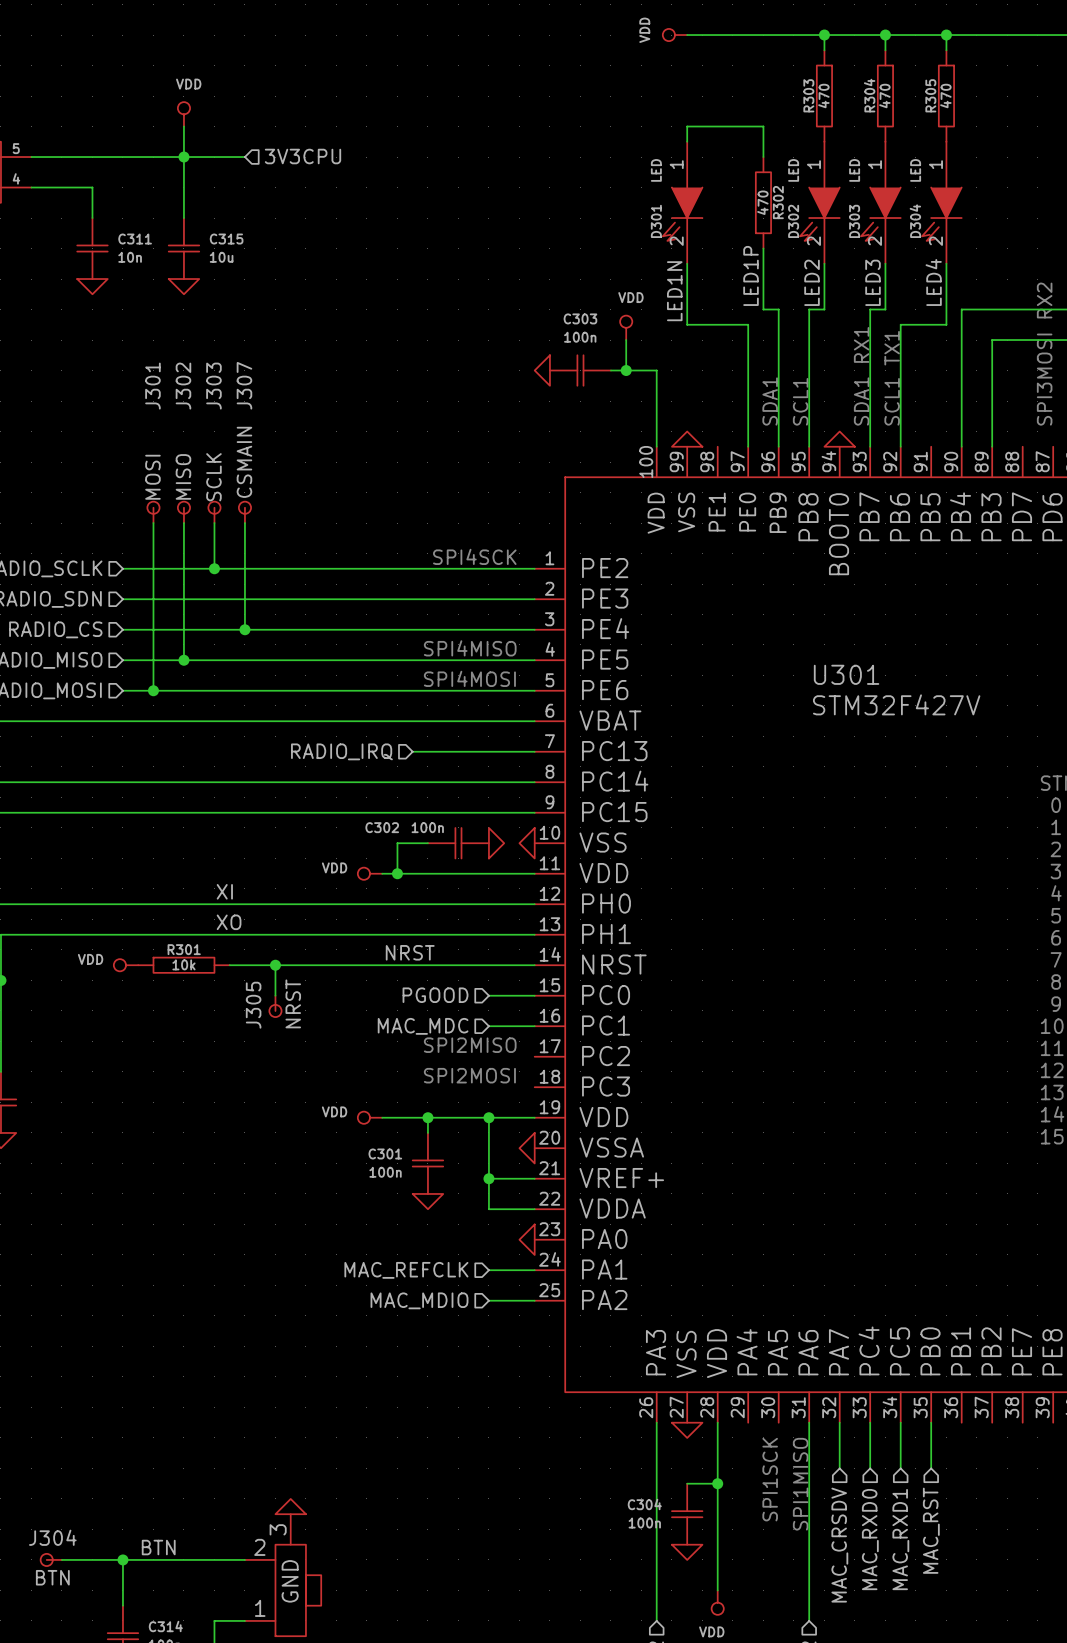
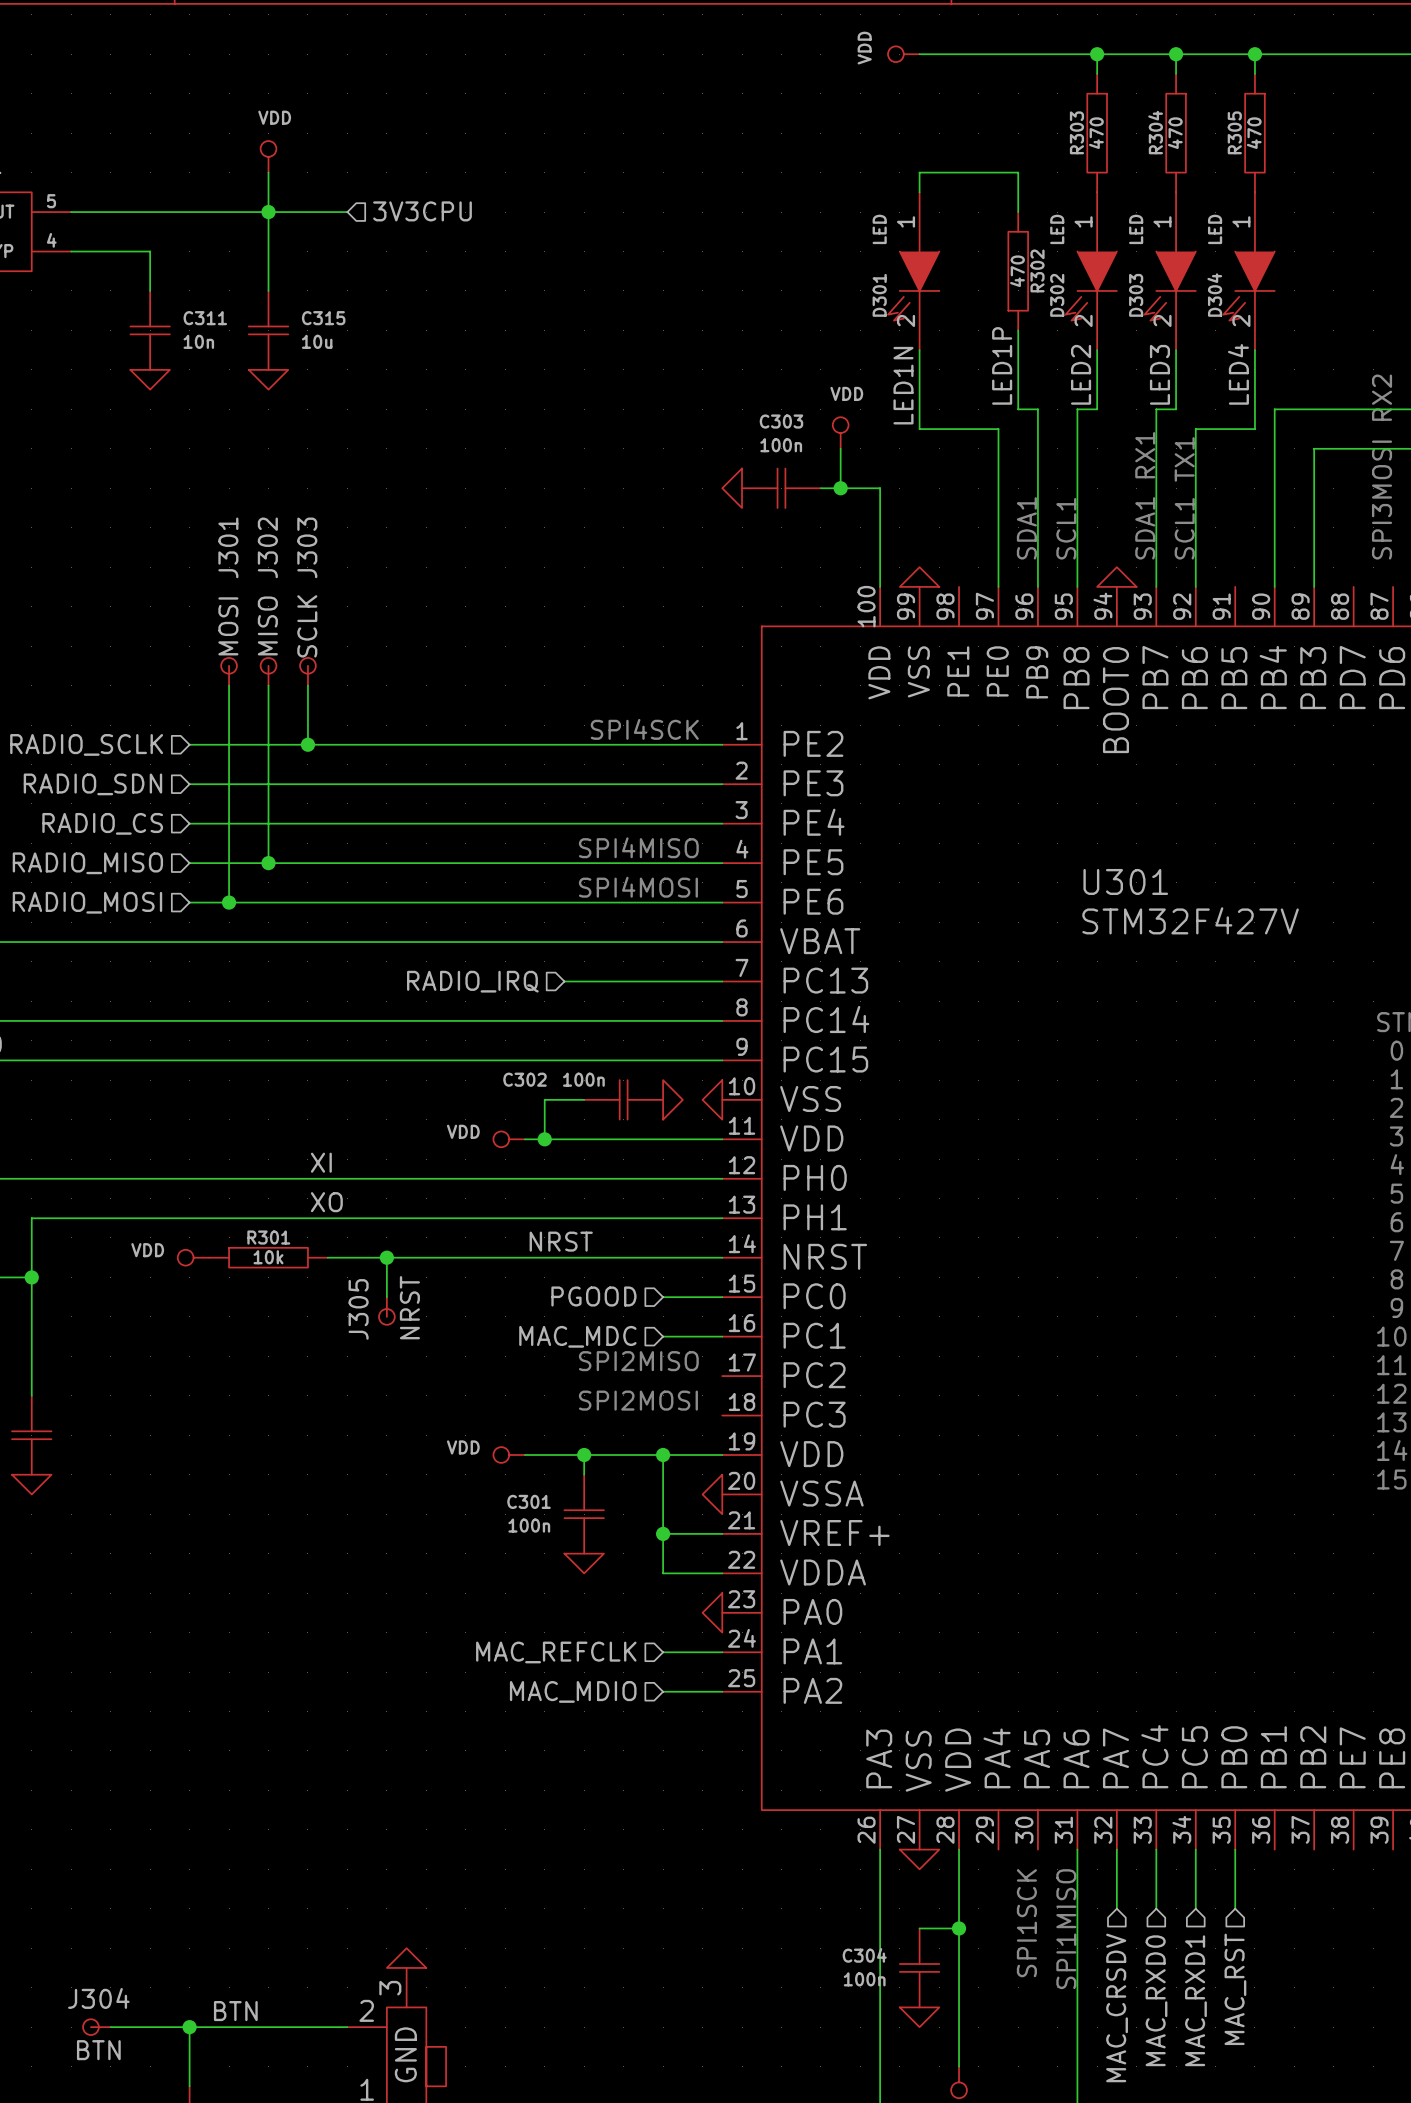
J301 name position: J301 (152, 386) -> J301 (228, 547)
J302 name position: J302 (183, 386) -> J302 (267, 547)
J303 name position: J303 (213, 386) -> J303 (307, 547)
J307: CSMAIN (244, 512) -> none
wire: (244, 523) (244, 629) -> none
junction: (244, 629) -> none

